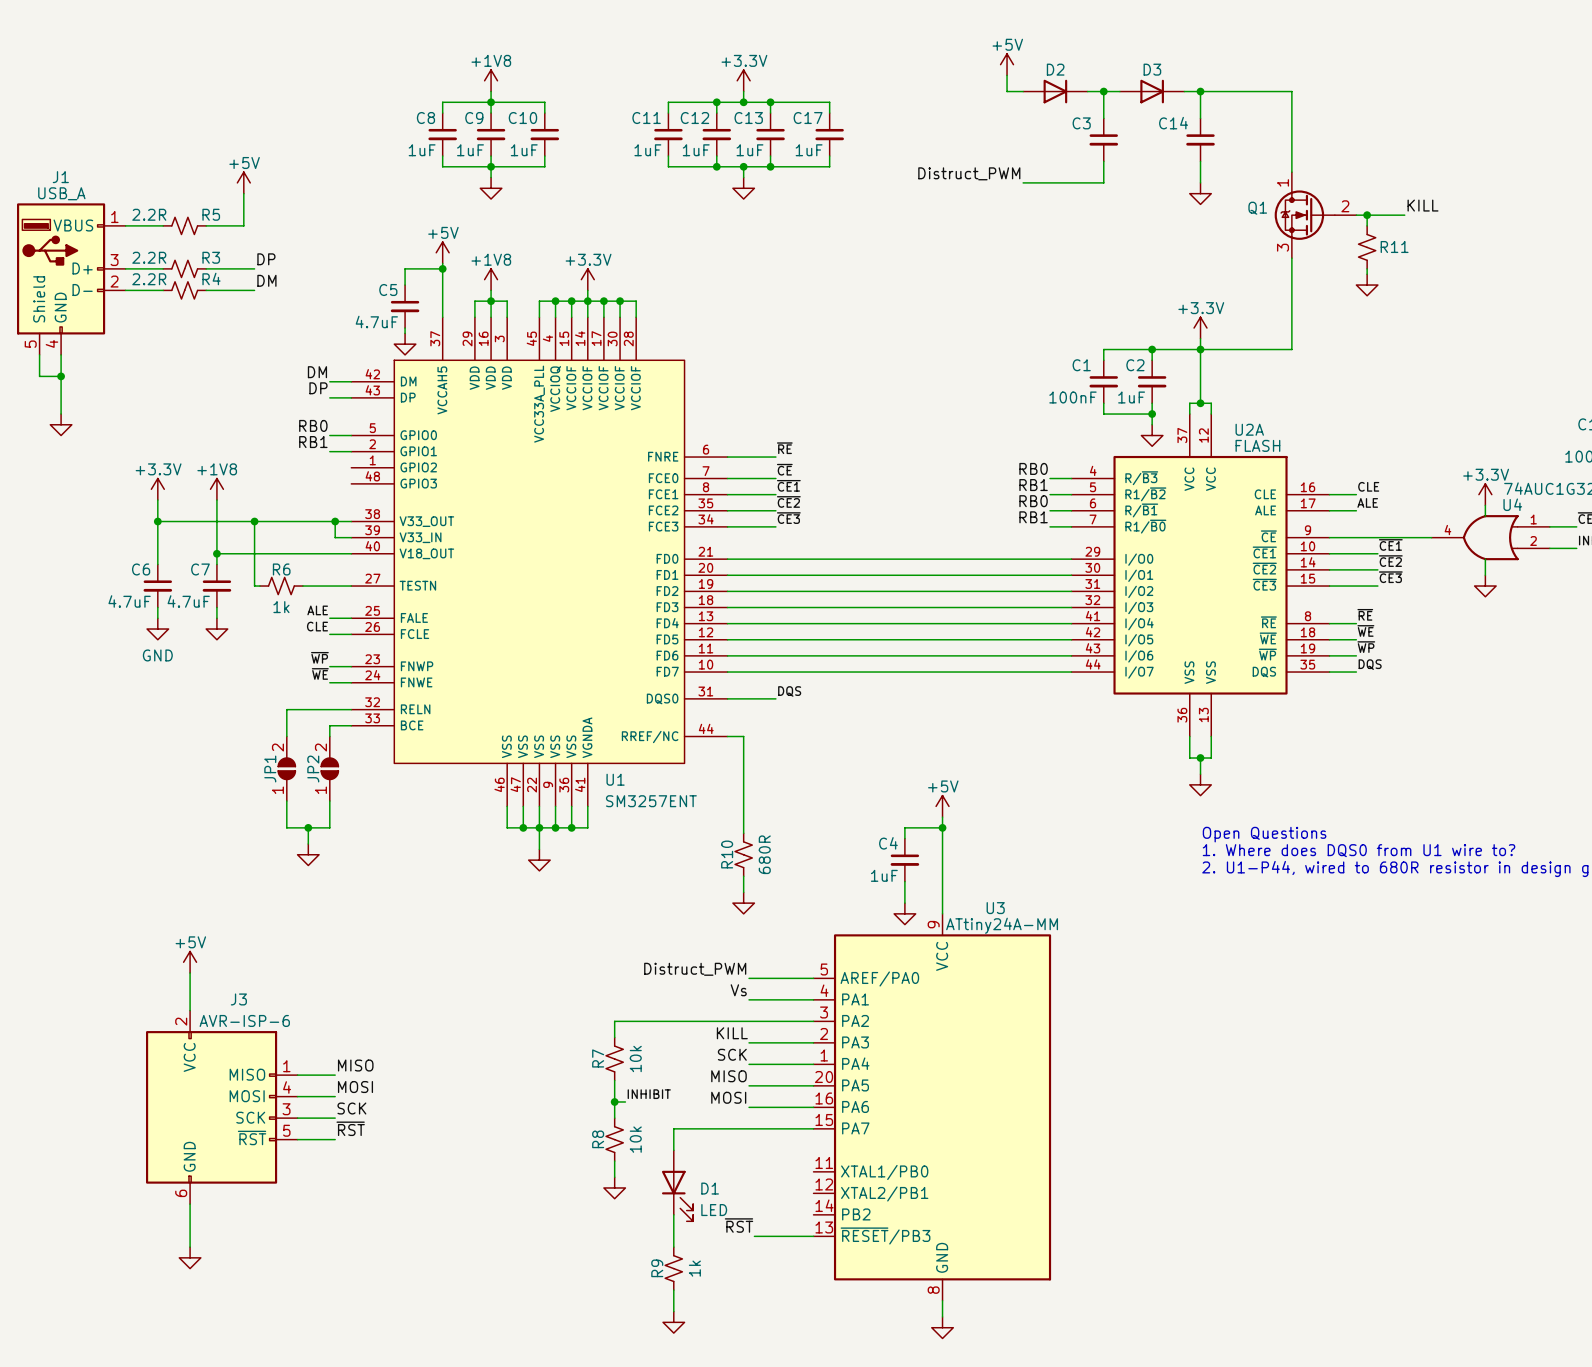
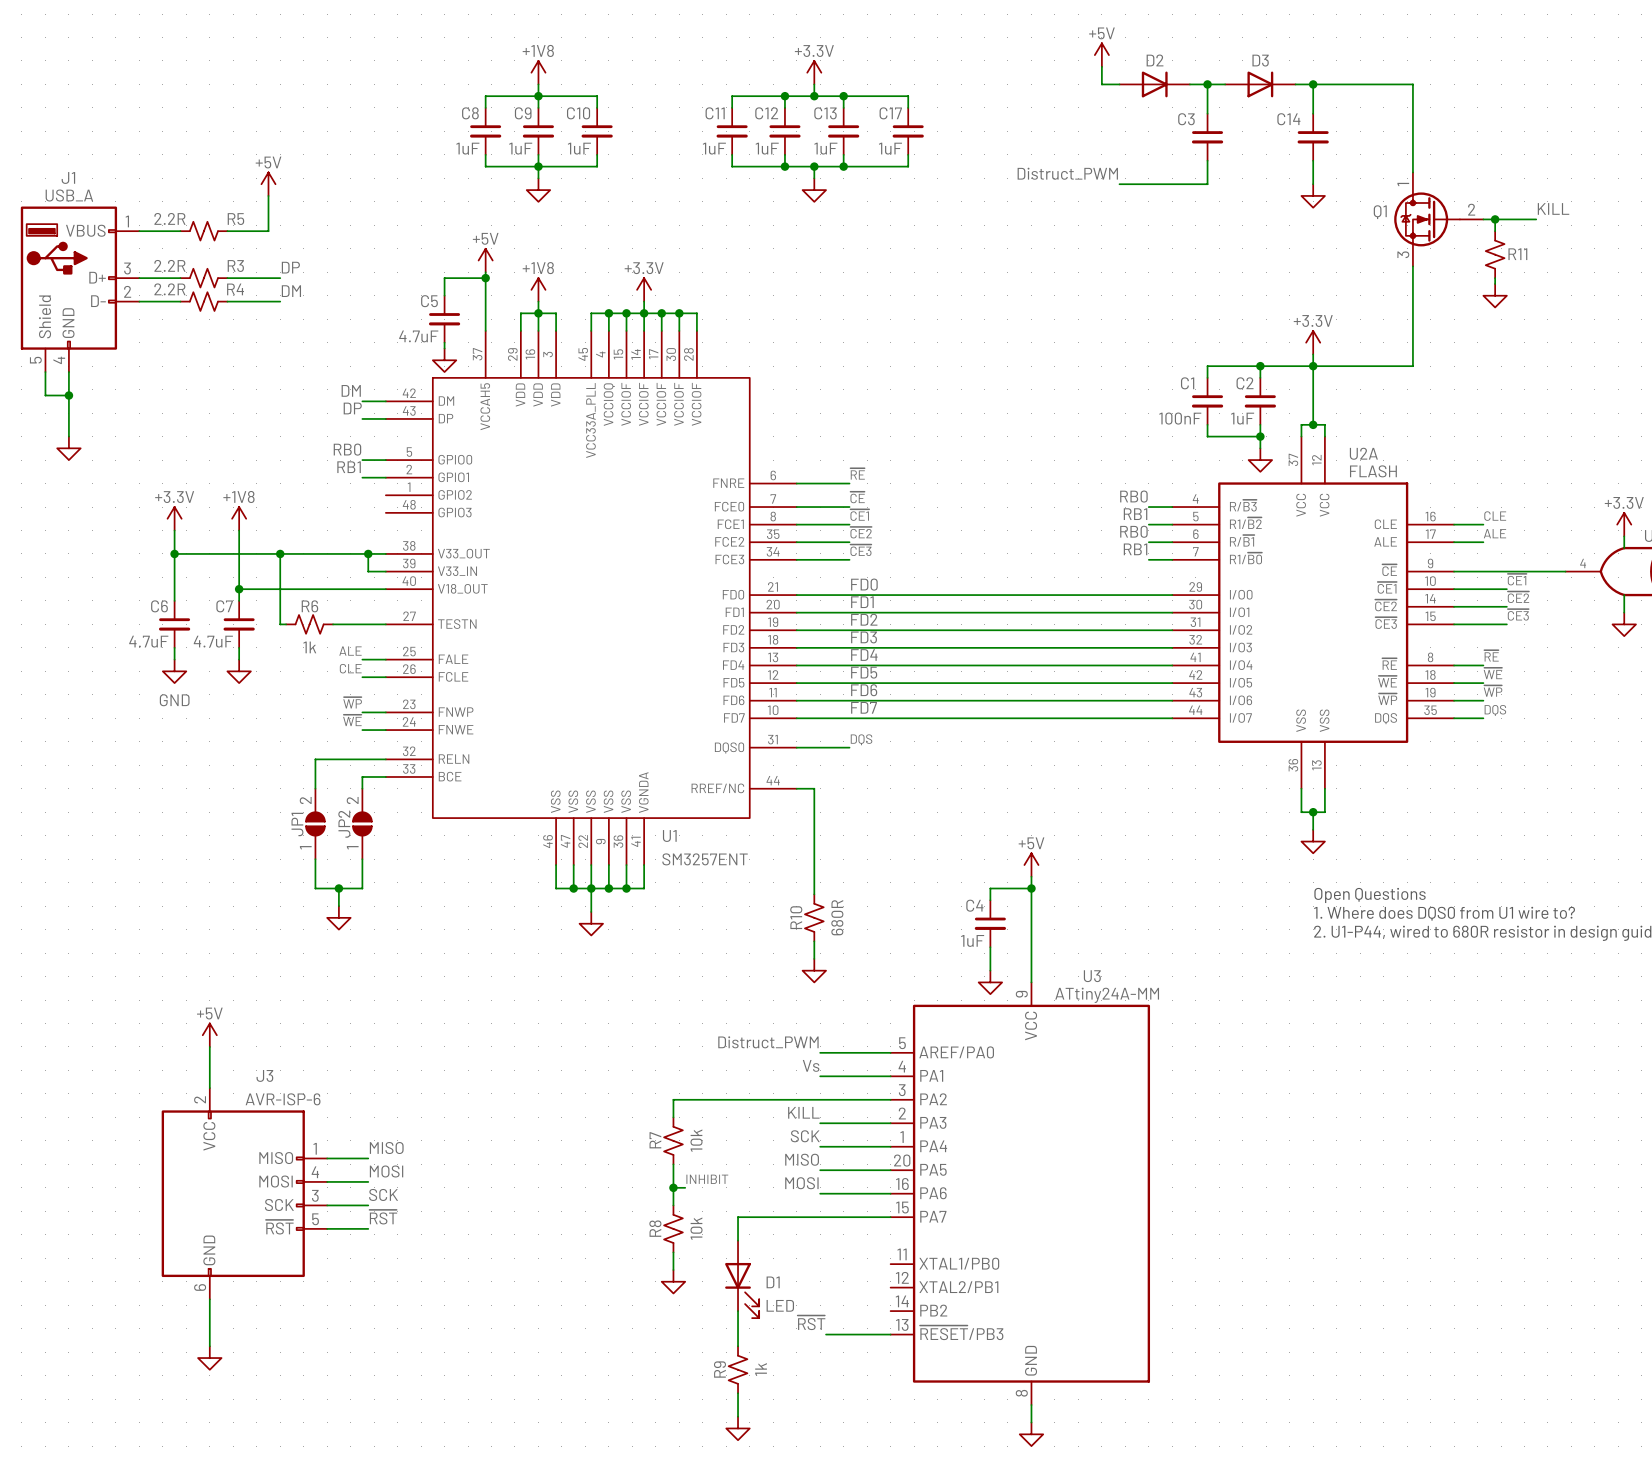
label: none -> FD0 (864, 584)
label: none -> FD1 (862, 602)
label: none -> FD2 (864, 619)
label: none -> FD3 (864, 637)
label: none -> FD4 (864, 655)
label: none -> FD5 (864, 672)
label: none -> FD6 (864, 690)
label: none -> FD7 (864, 707)

